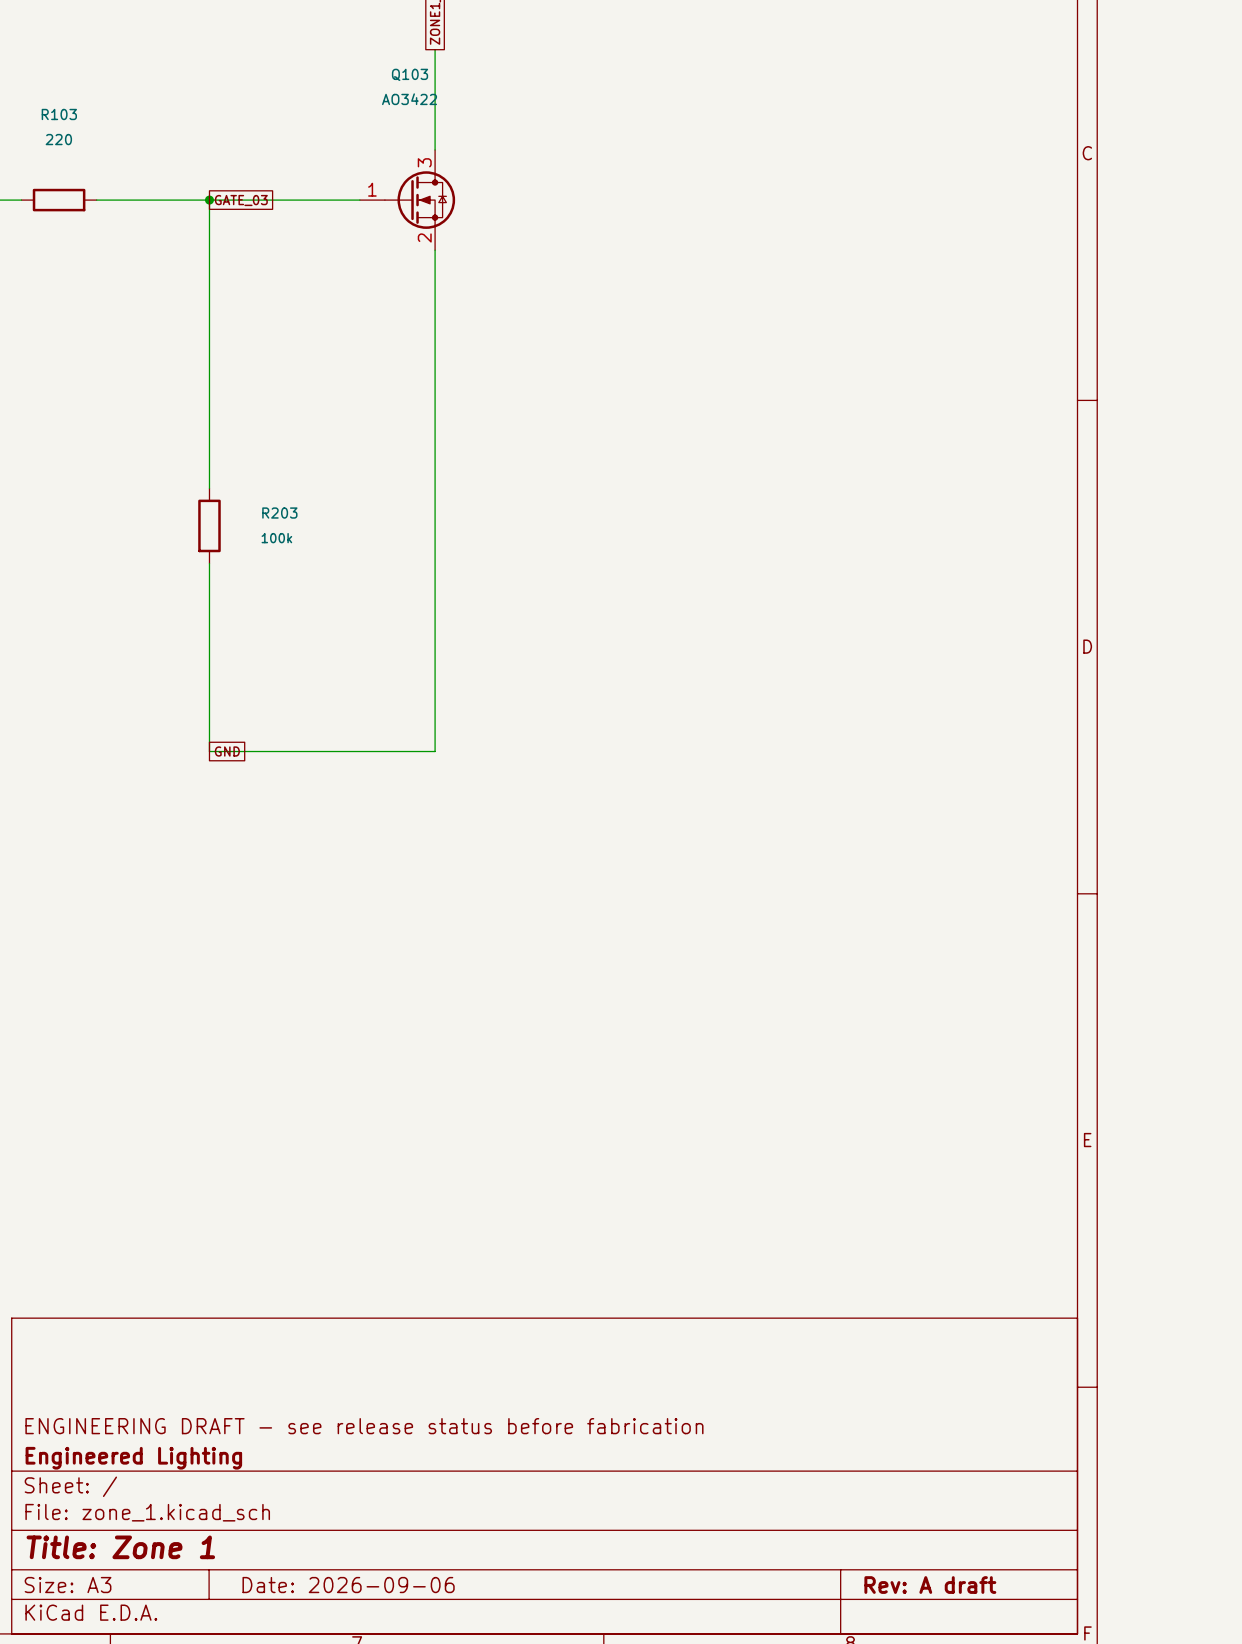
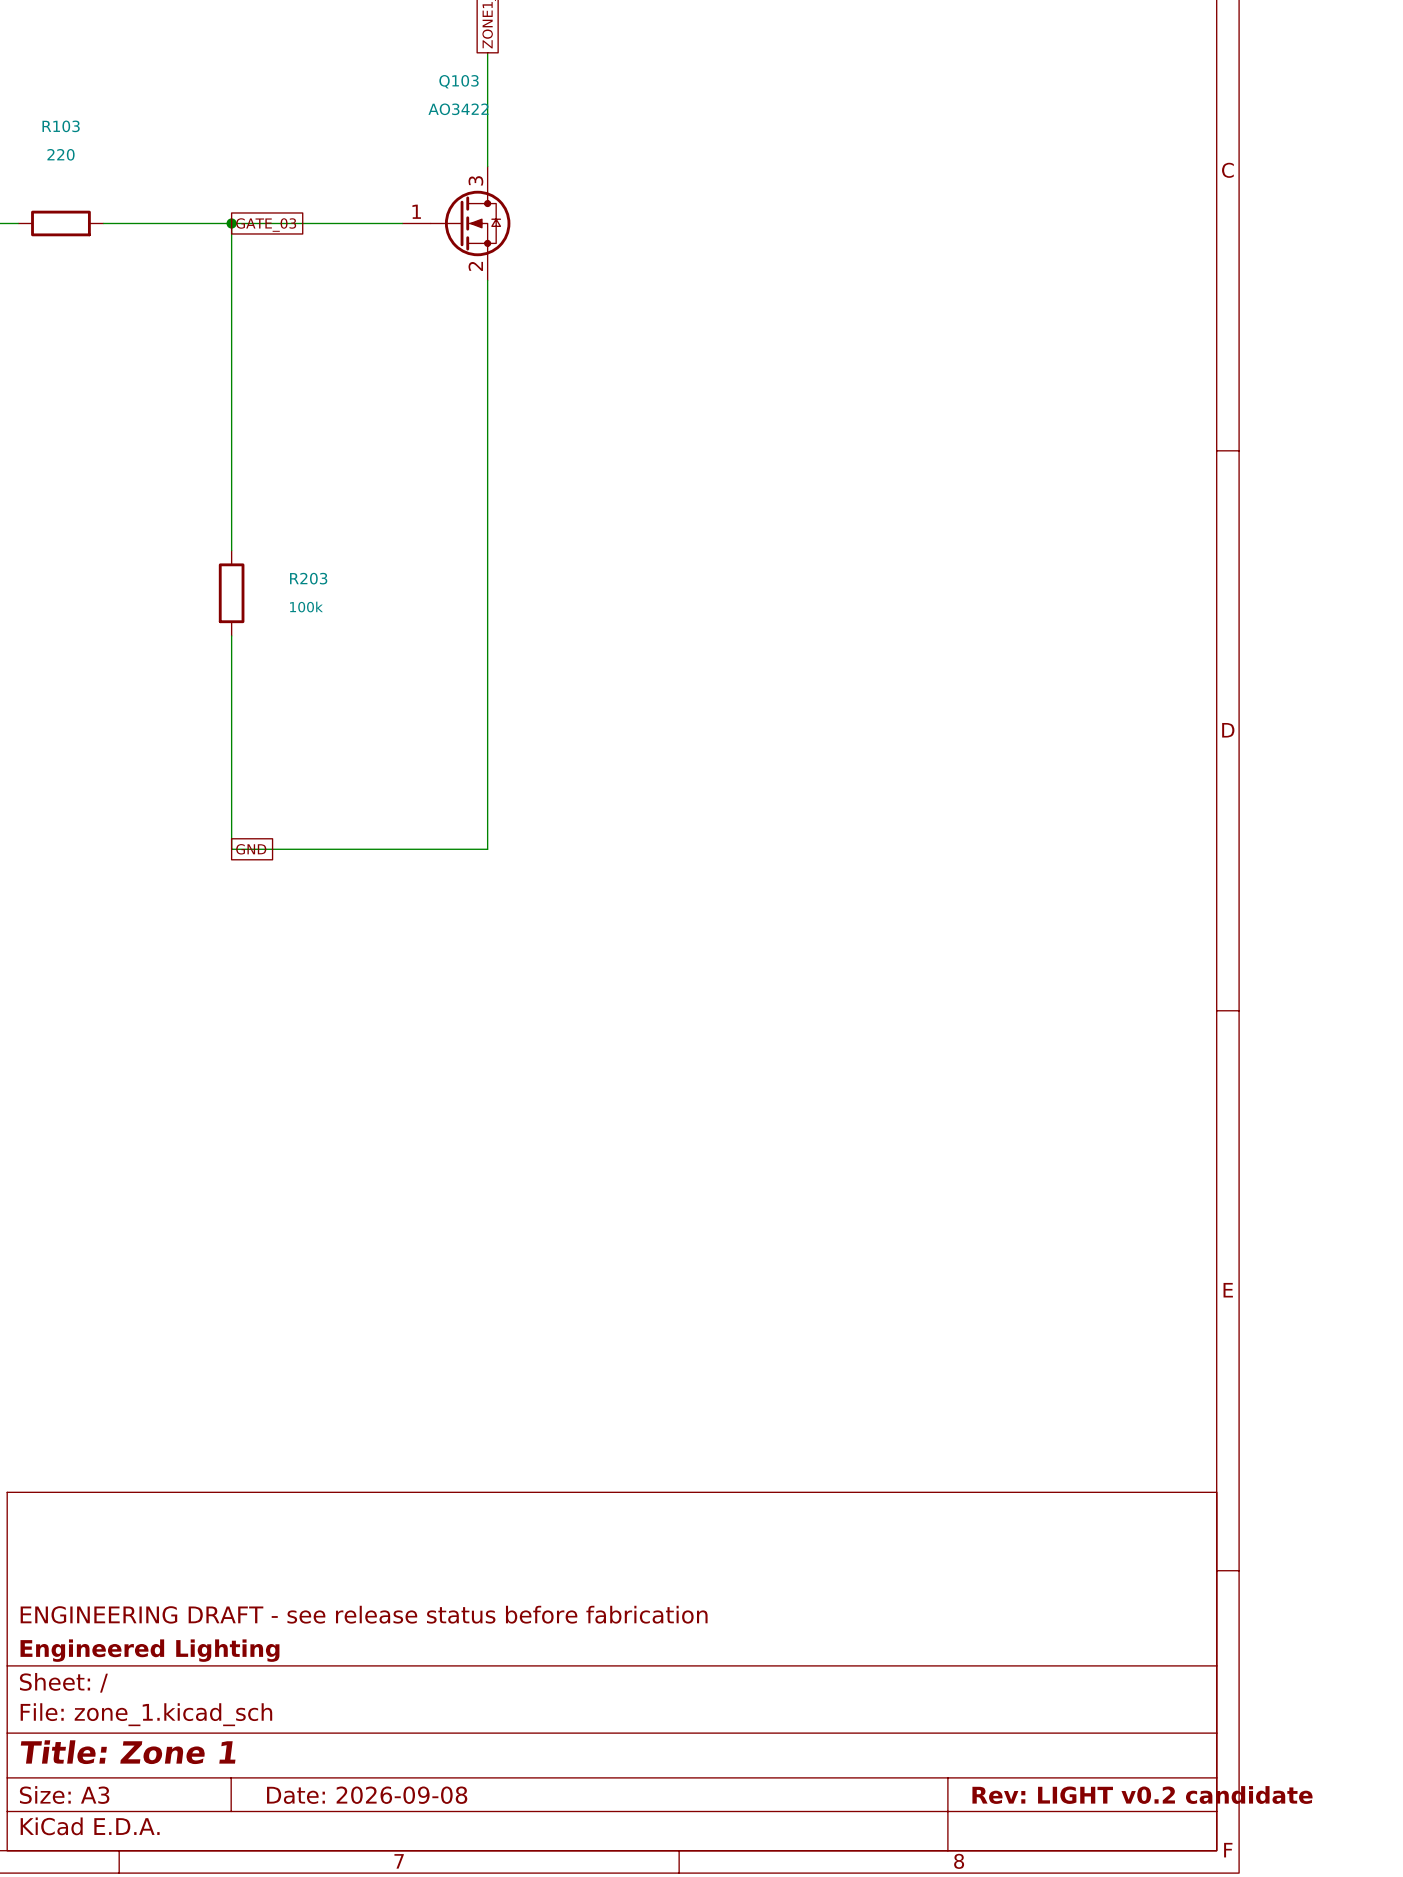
title block: Date: 2026-09-06 (348, 1585) -> Date: 2026-09-08 (367, 1795)
title block: Rev: A draft (930, 1585) -> Rev: LIGHT v0.2 candidate (1142, 1795)

